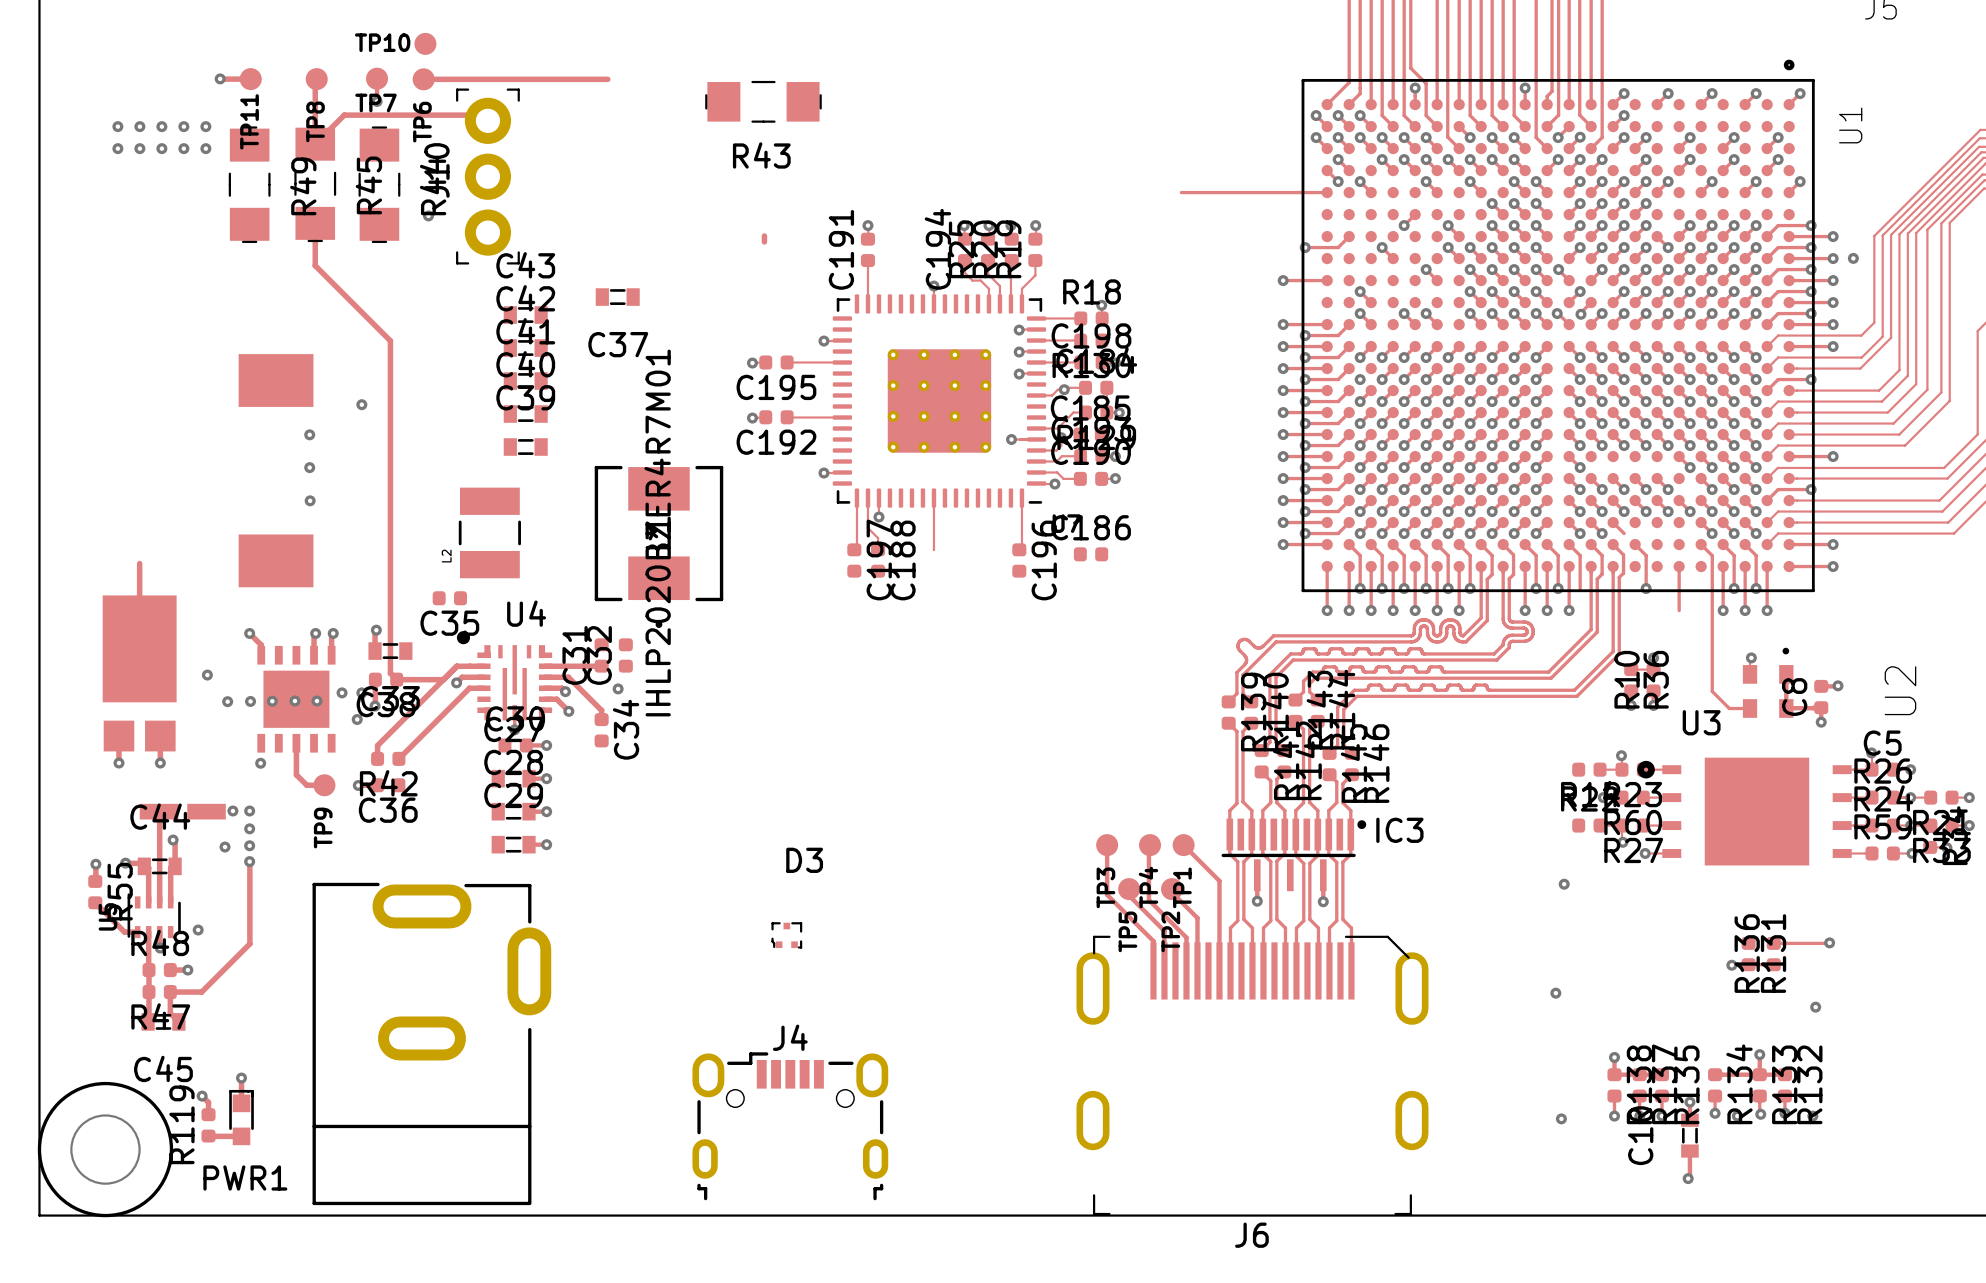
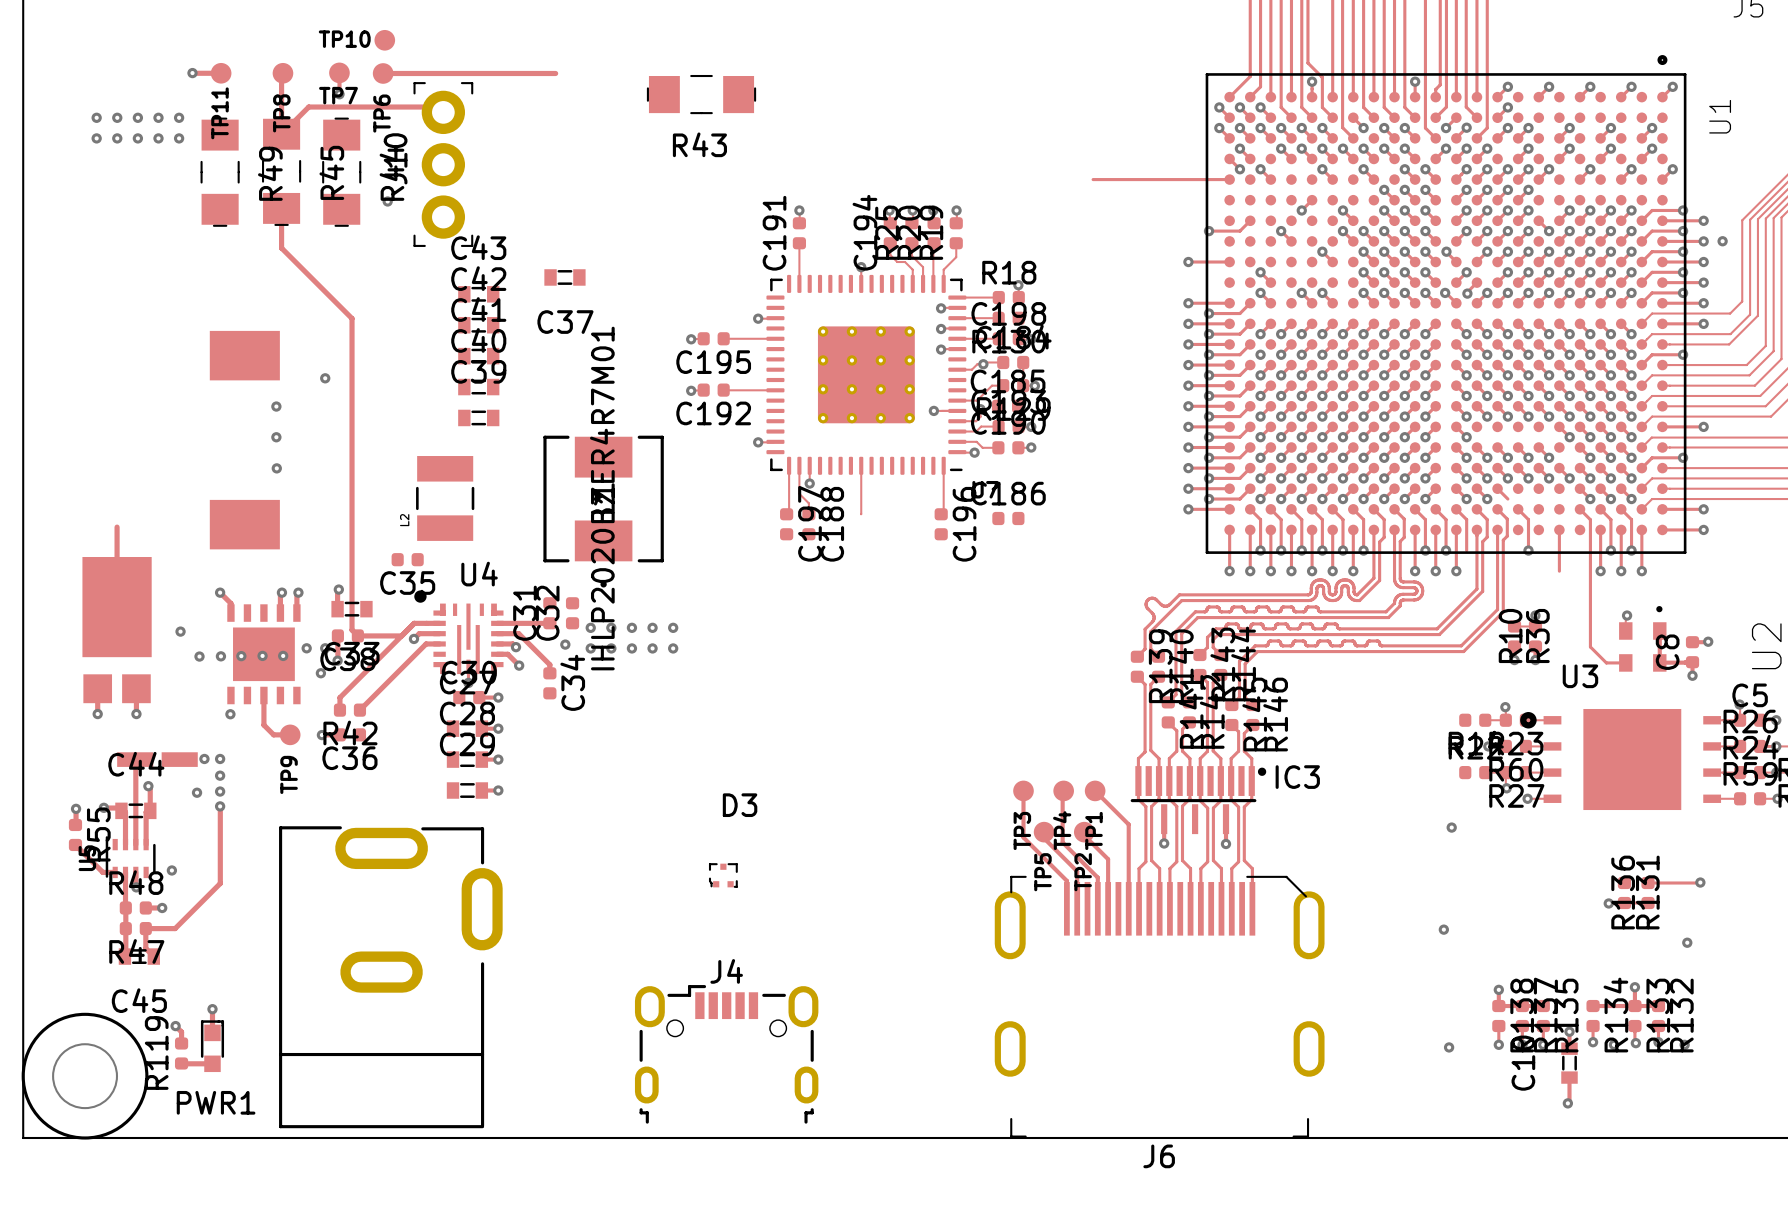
track: (764, 235) (764, 241) -> none
via: none -> (590, 627)
via: none -> (611, 627)
via: none -> (631, 627)
via: none -> (652, 627)
via: none -> (673, 627)
via: none -> (590, 648)
via: none -> (611, 648)
via: none -> (631, 648)
via: none -> (652, 648)
via: none -> (673, 648)

